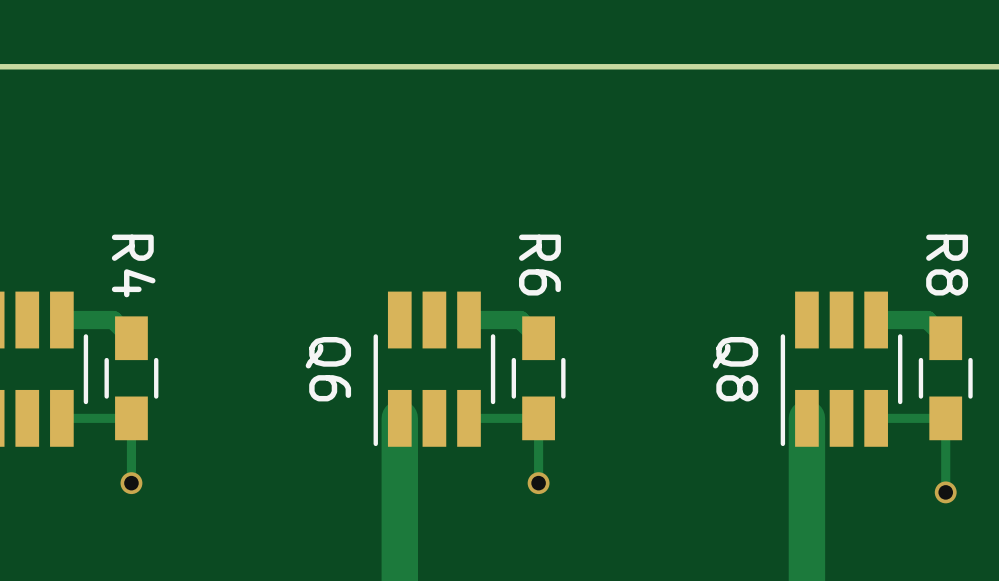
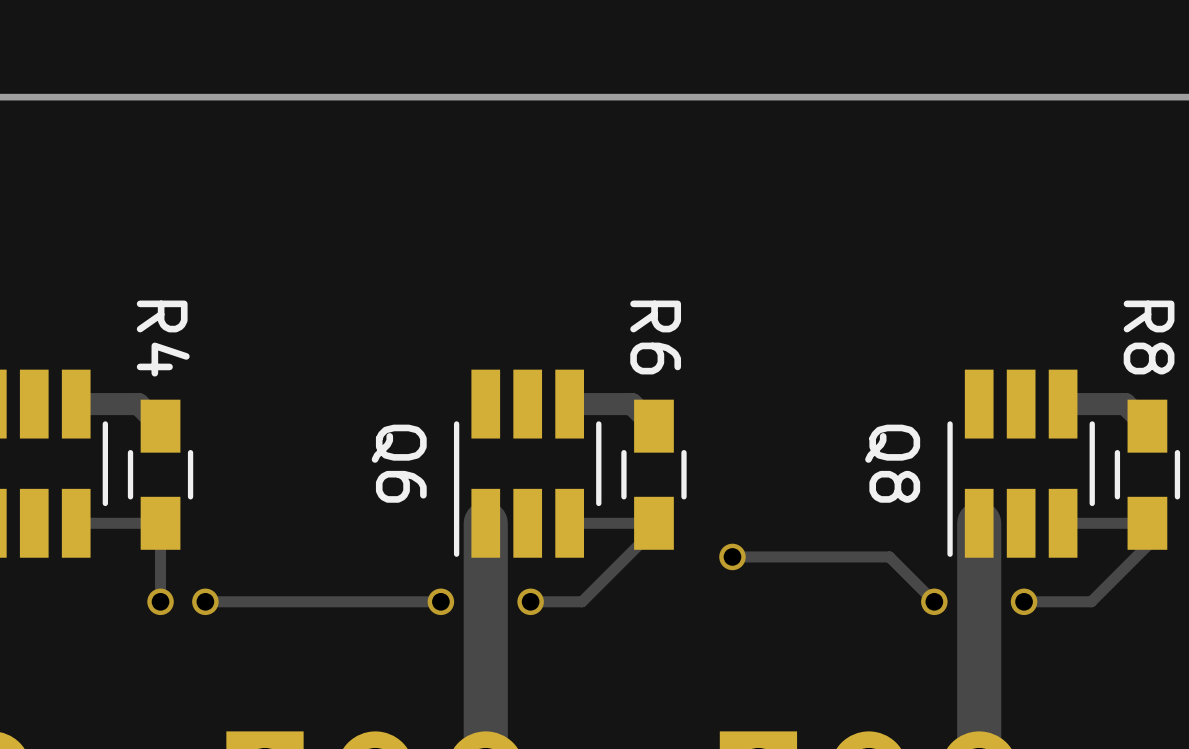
track: (538, 423) (538, 483) -> (653, 529) (582, 601) (530, 601)
track: (945, 436) (945, 492) -> (1147, 545) (1091, 601) (1024, 601)
track: none -> (732, 556) (889, 556) (934, 601)
via: none -> (732, 556)
via: none -> (205, 601)
track: none -> (440, 601) (205, 601)
via: none -> (440, 601)
via: none -> (530, 601)
via: (538, 483) -> none
via: none -> (934, 601)
via: none -> (1024, 601)
via: (945, 492) -> none

